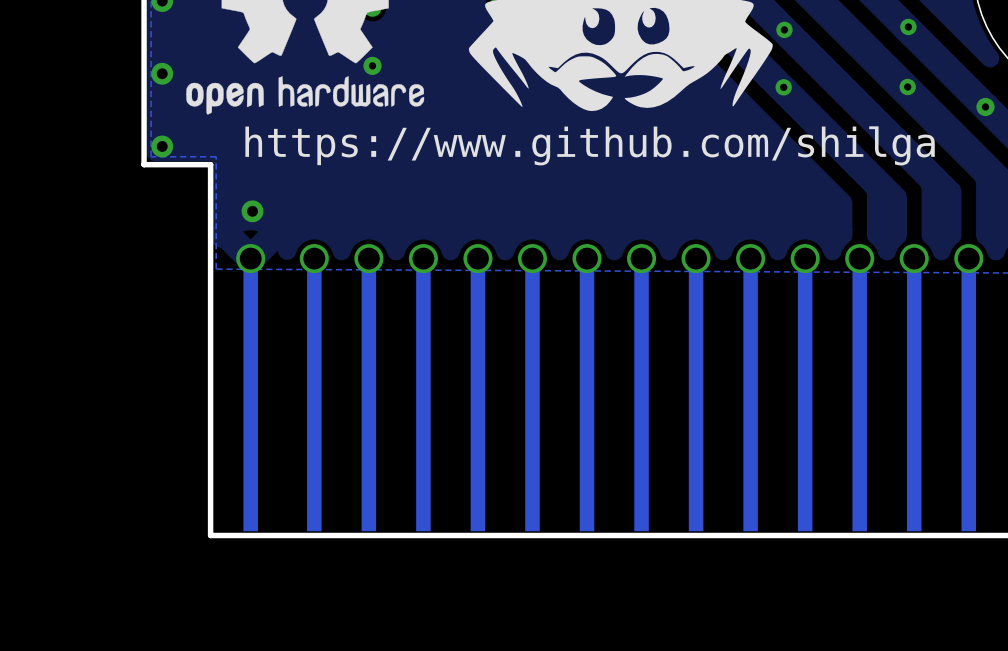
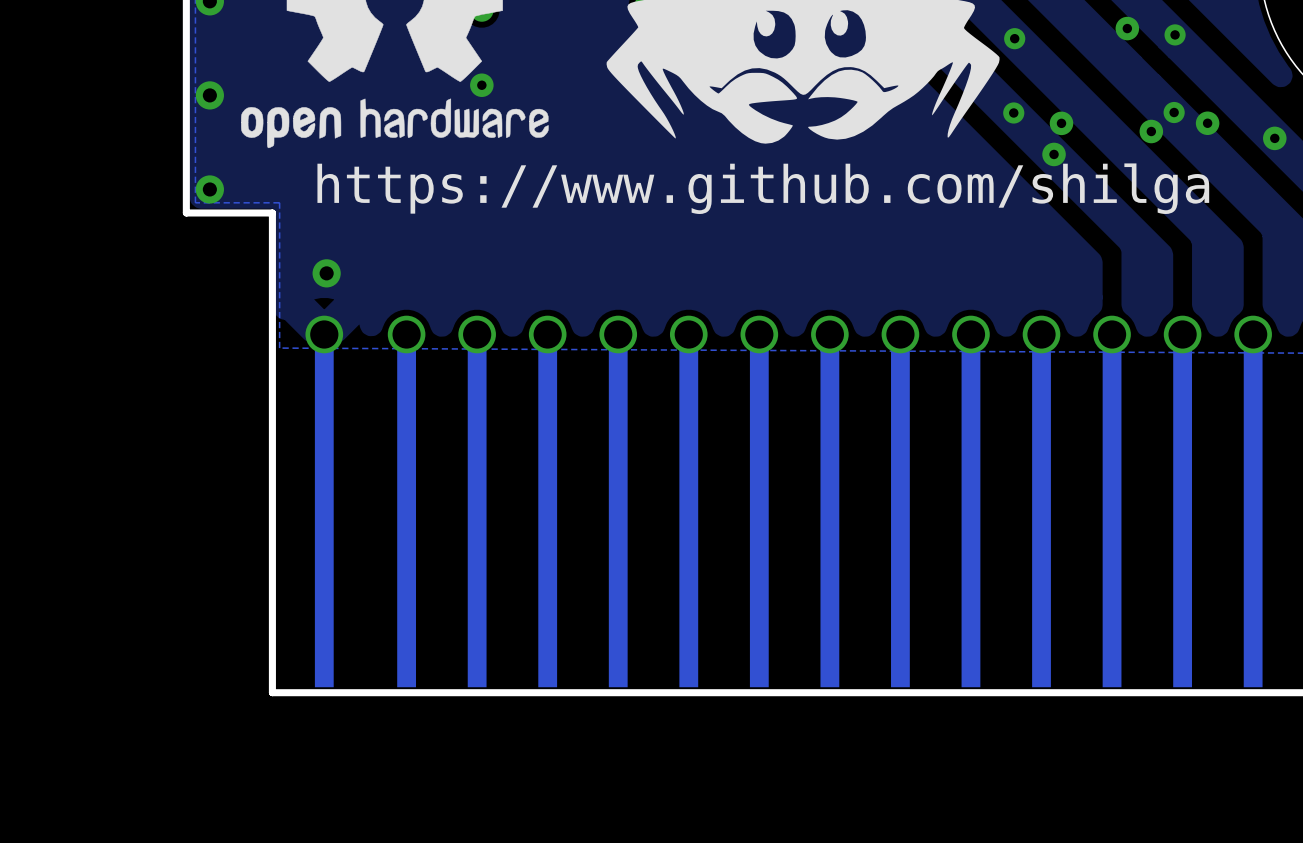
via: none -> (1127, 28)
via: none -> (1061, 123)
via: none -> (1207, 123)
via: none -> (1151, 131)
via: none -> (1054, 154)

